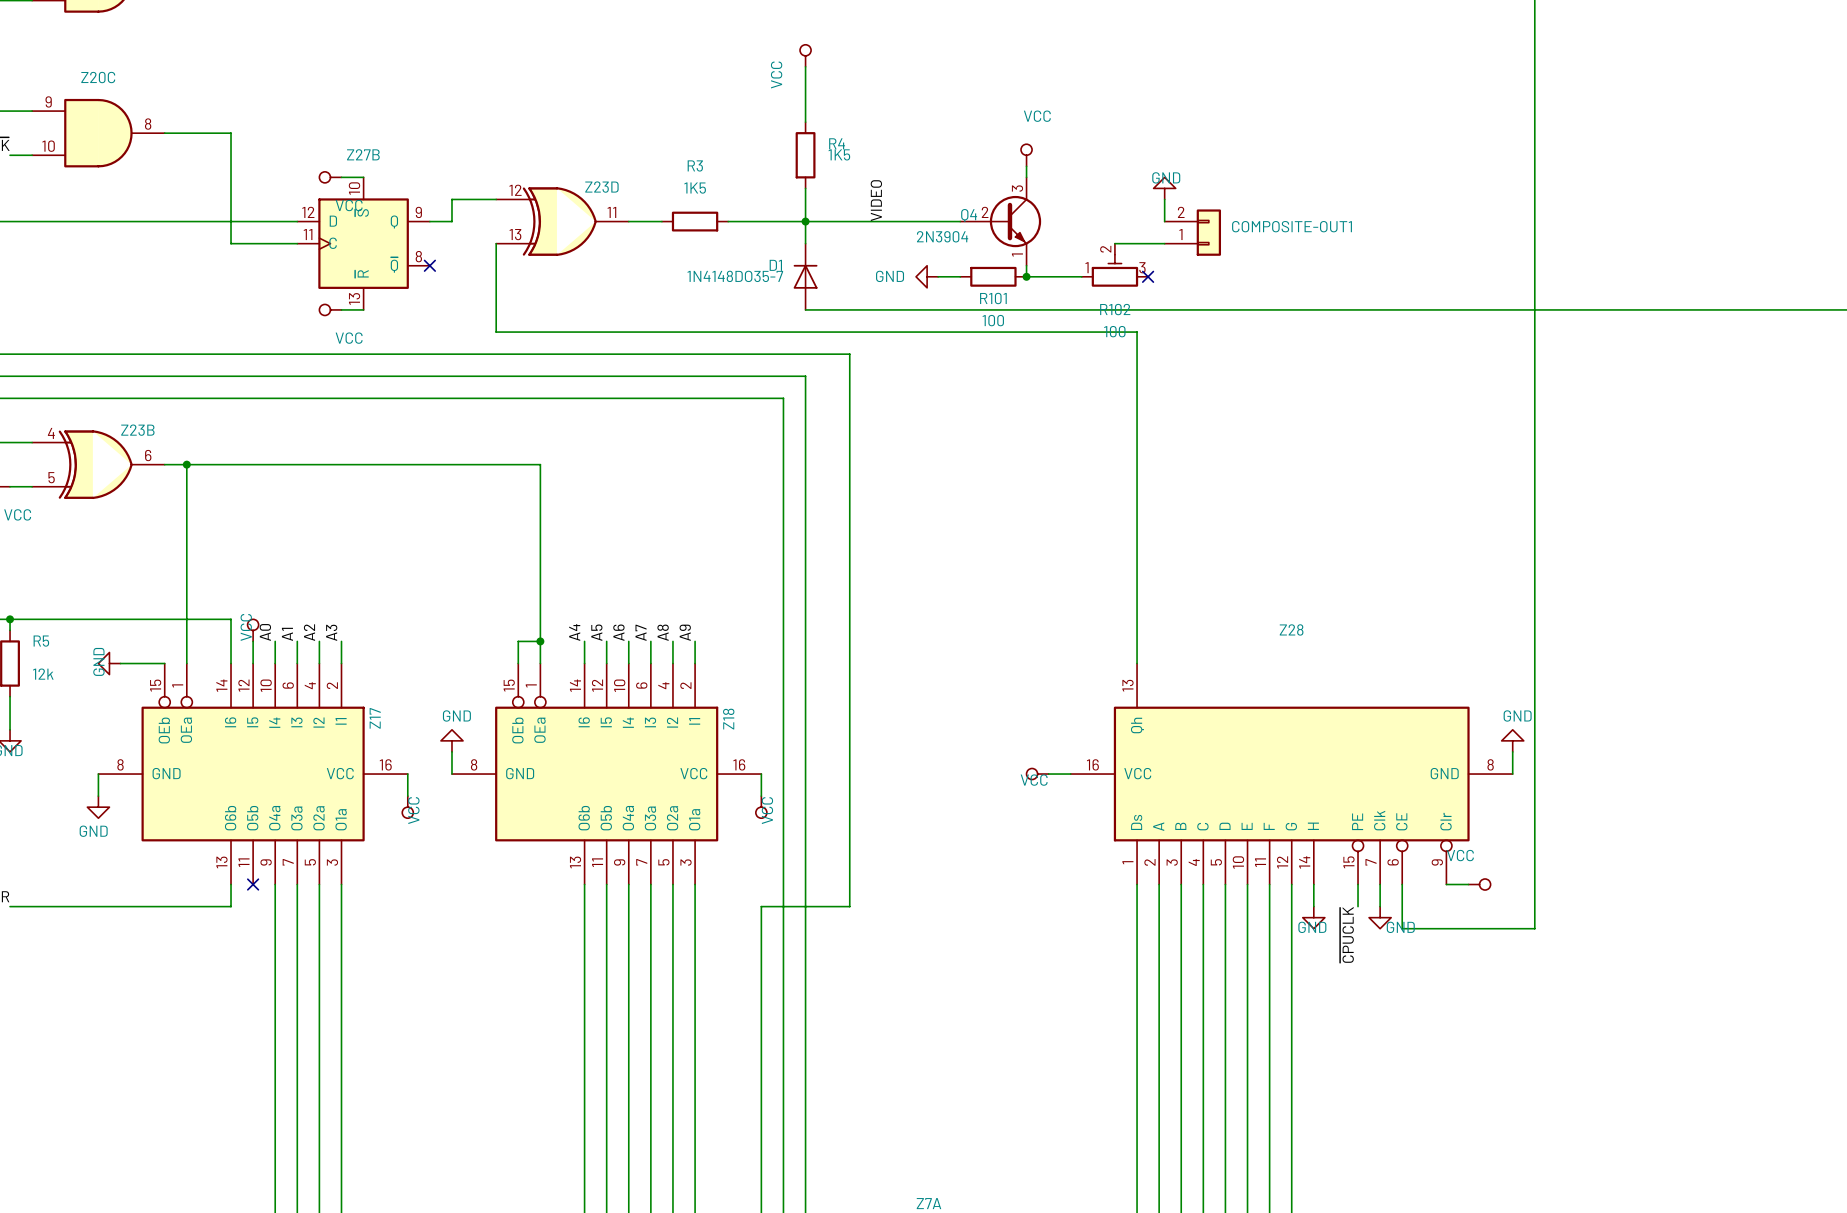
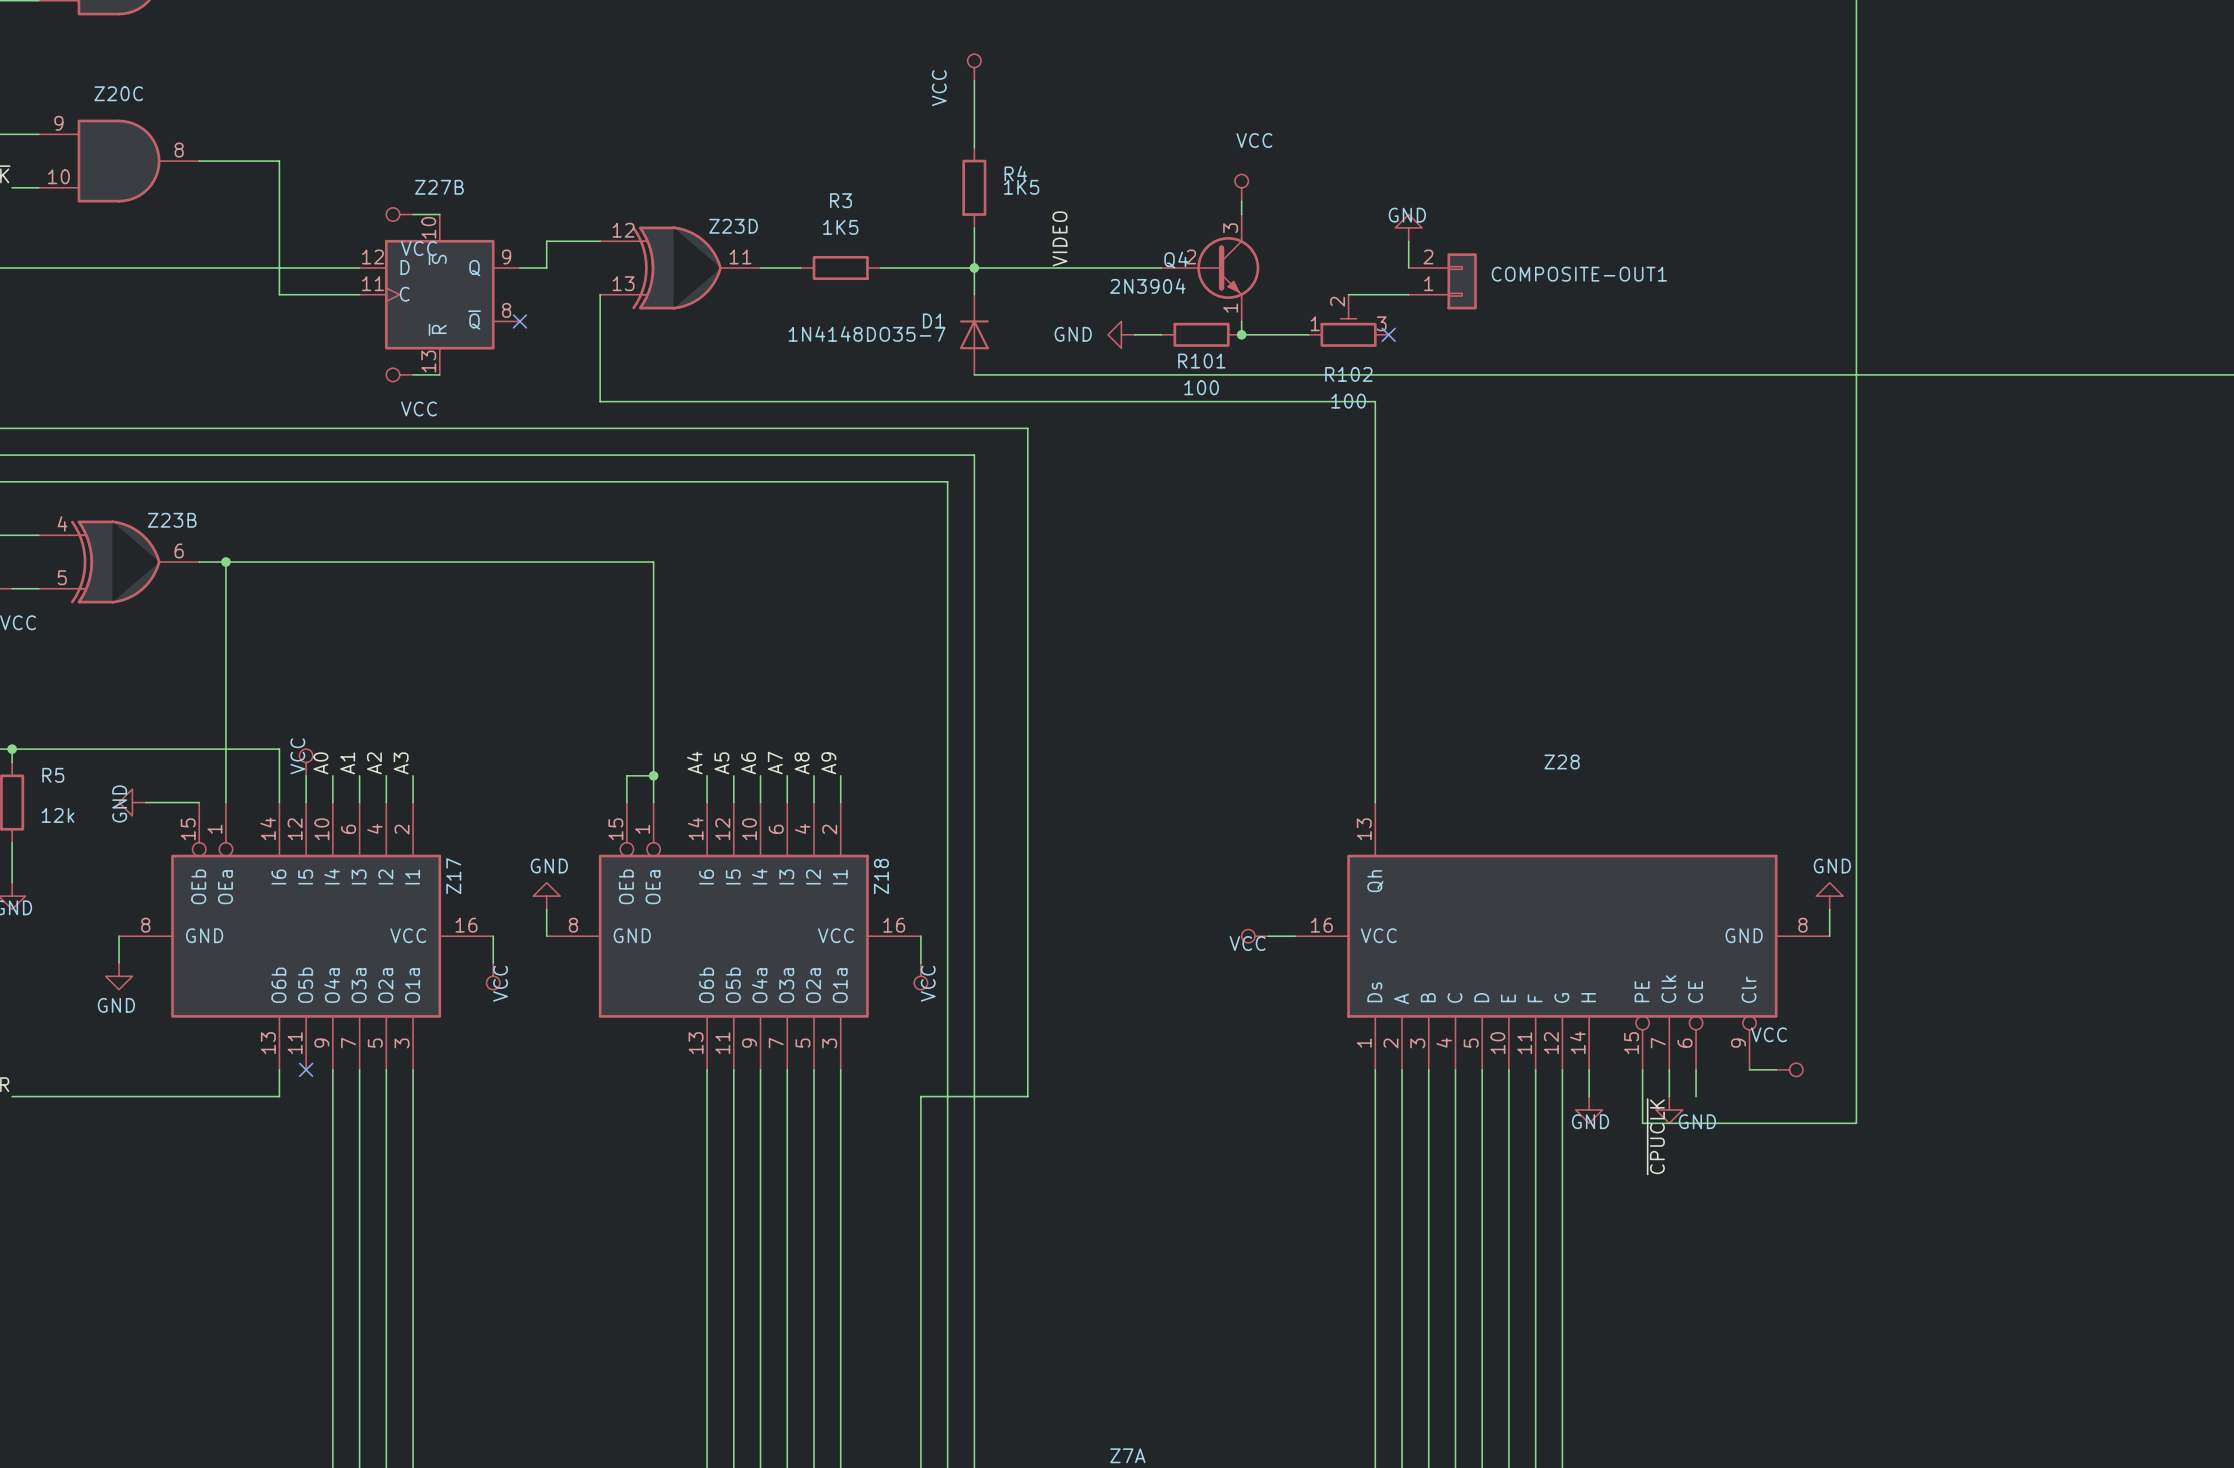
wire: (1402, 906) (1402, 928) -> (1642, 1096) (1642, 1123) (1696, 1123)
label position: ~{CPUCLK} (1346, 934) -> ~{CPUCLK} (1655, 1136)

